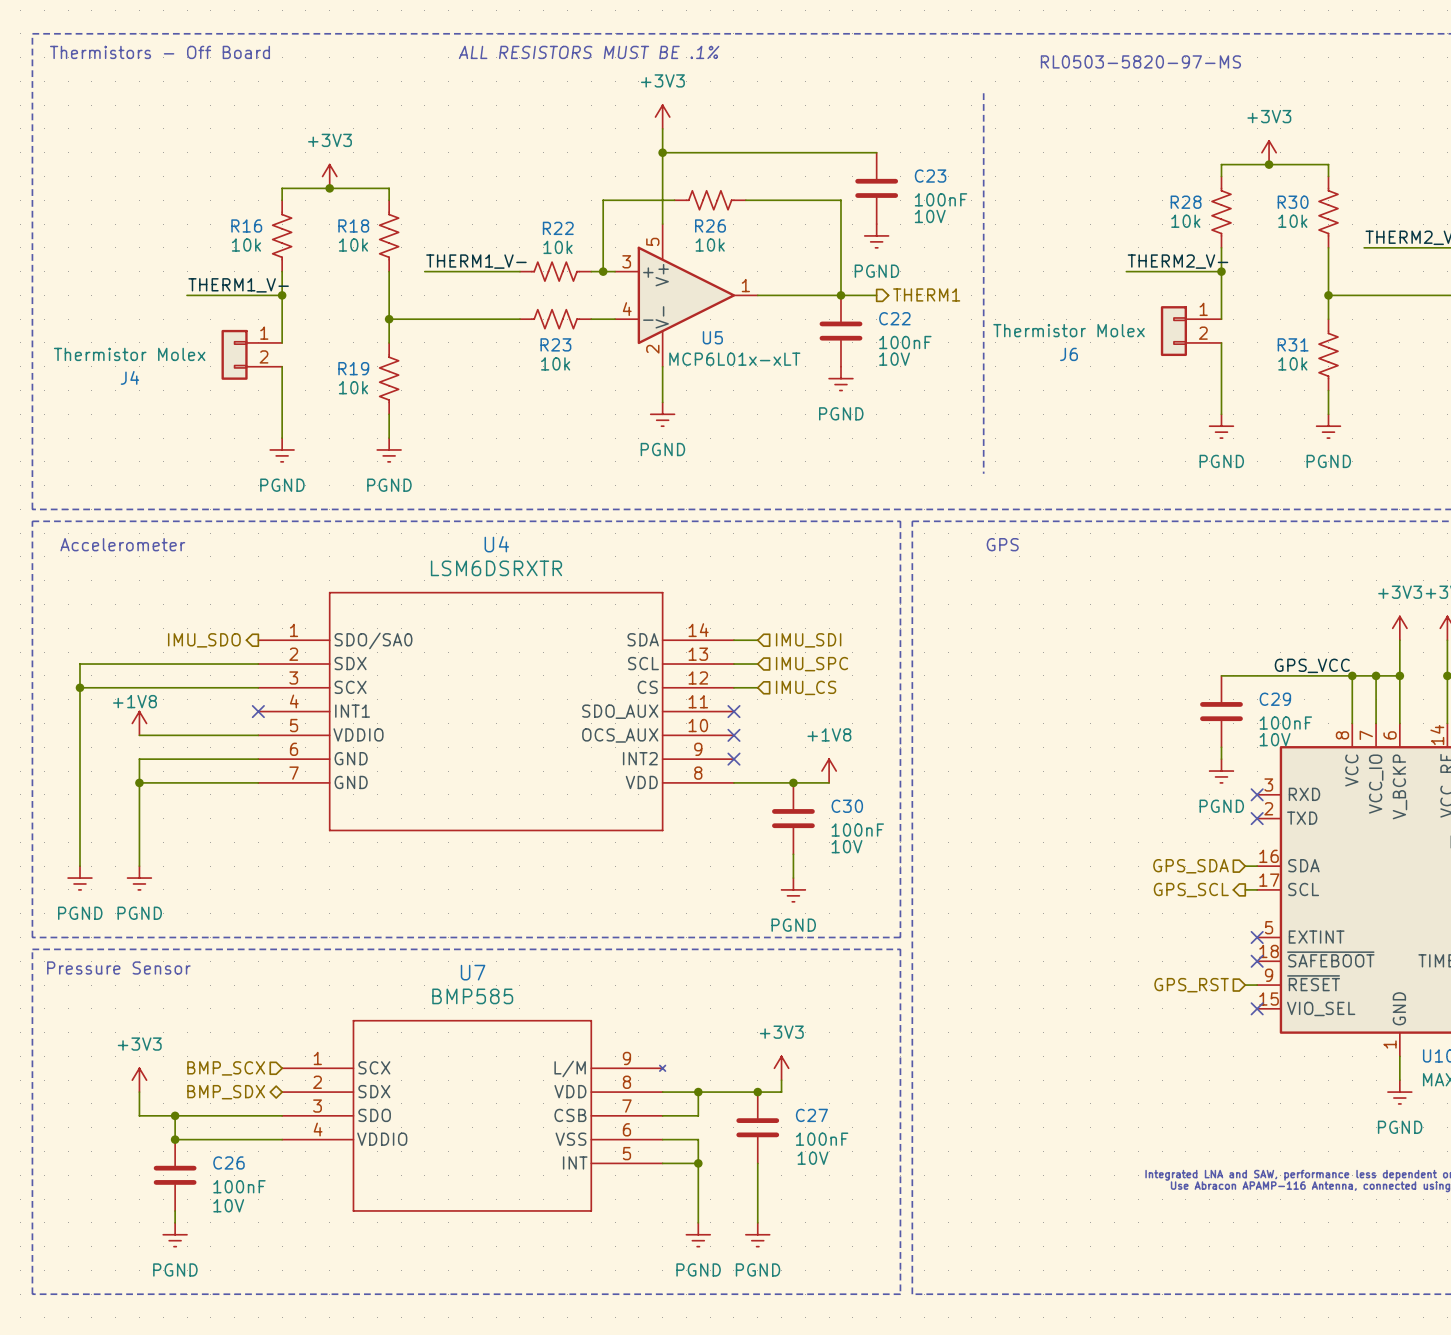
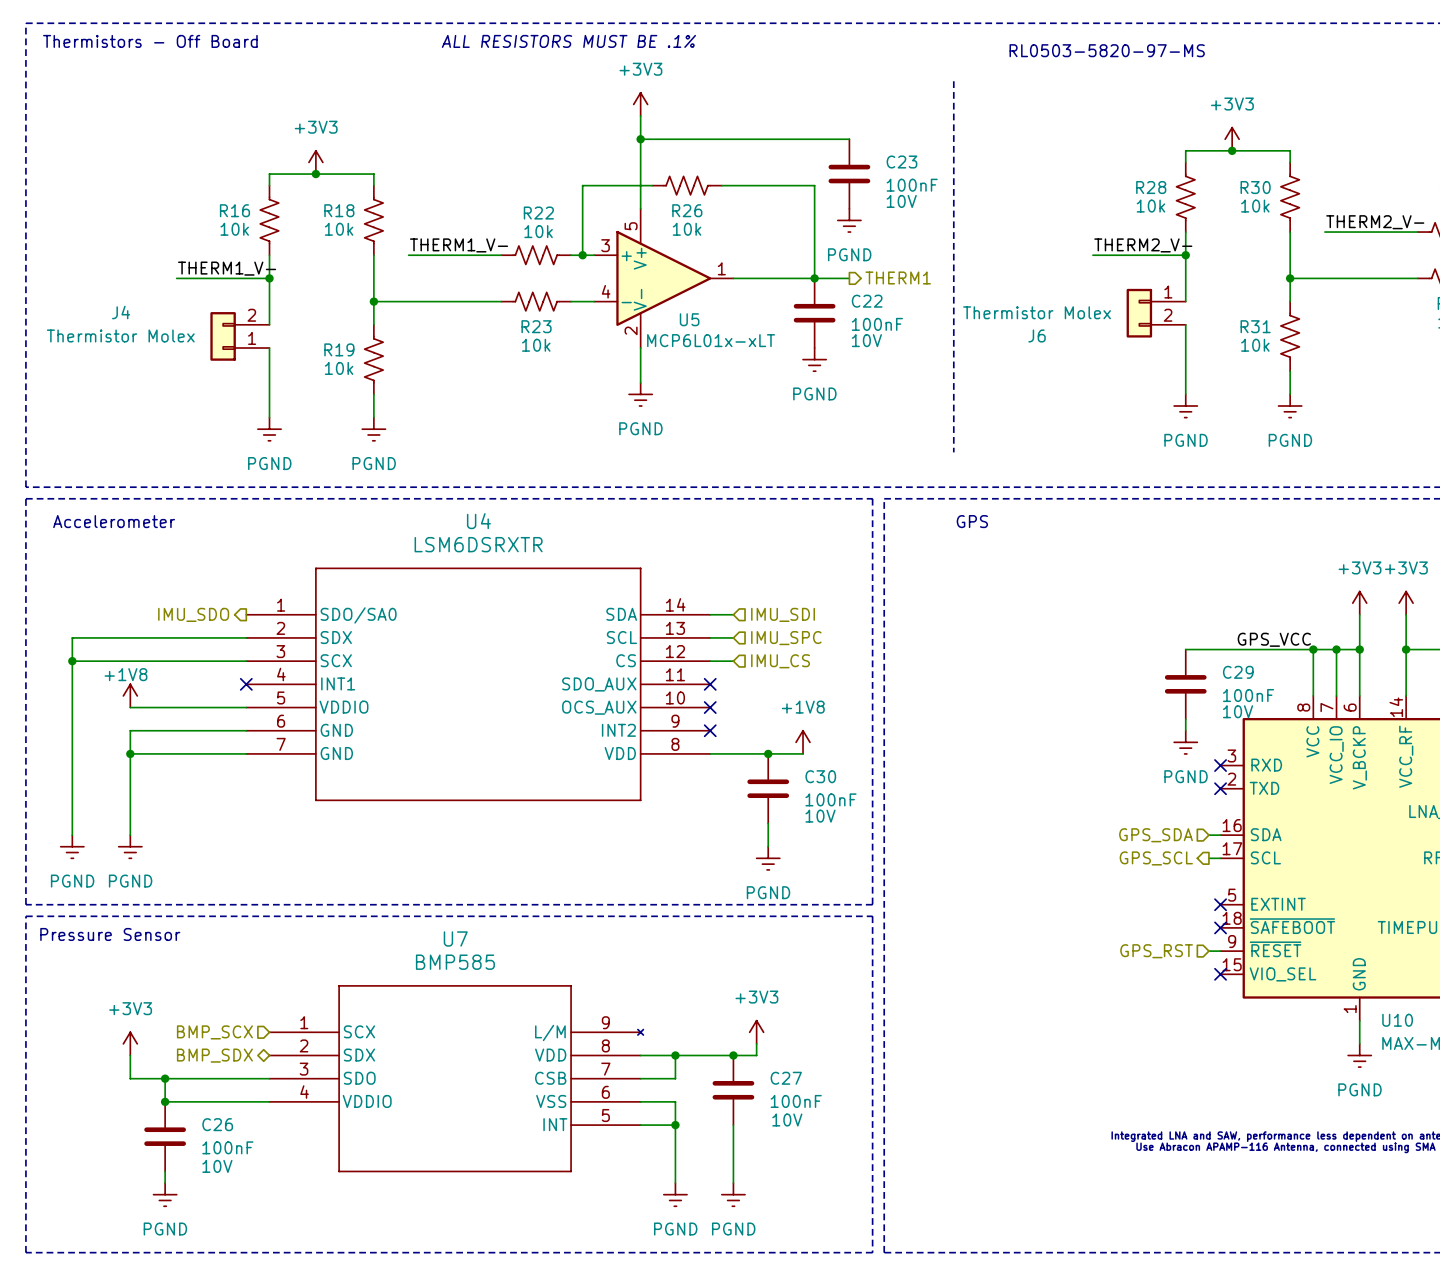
J4 flip: as is (234, 354) -> up-down (223, 336)

